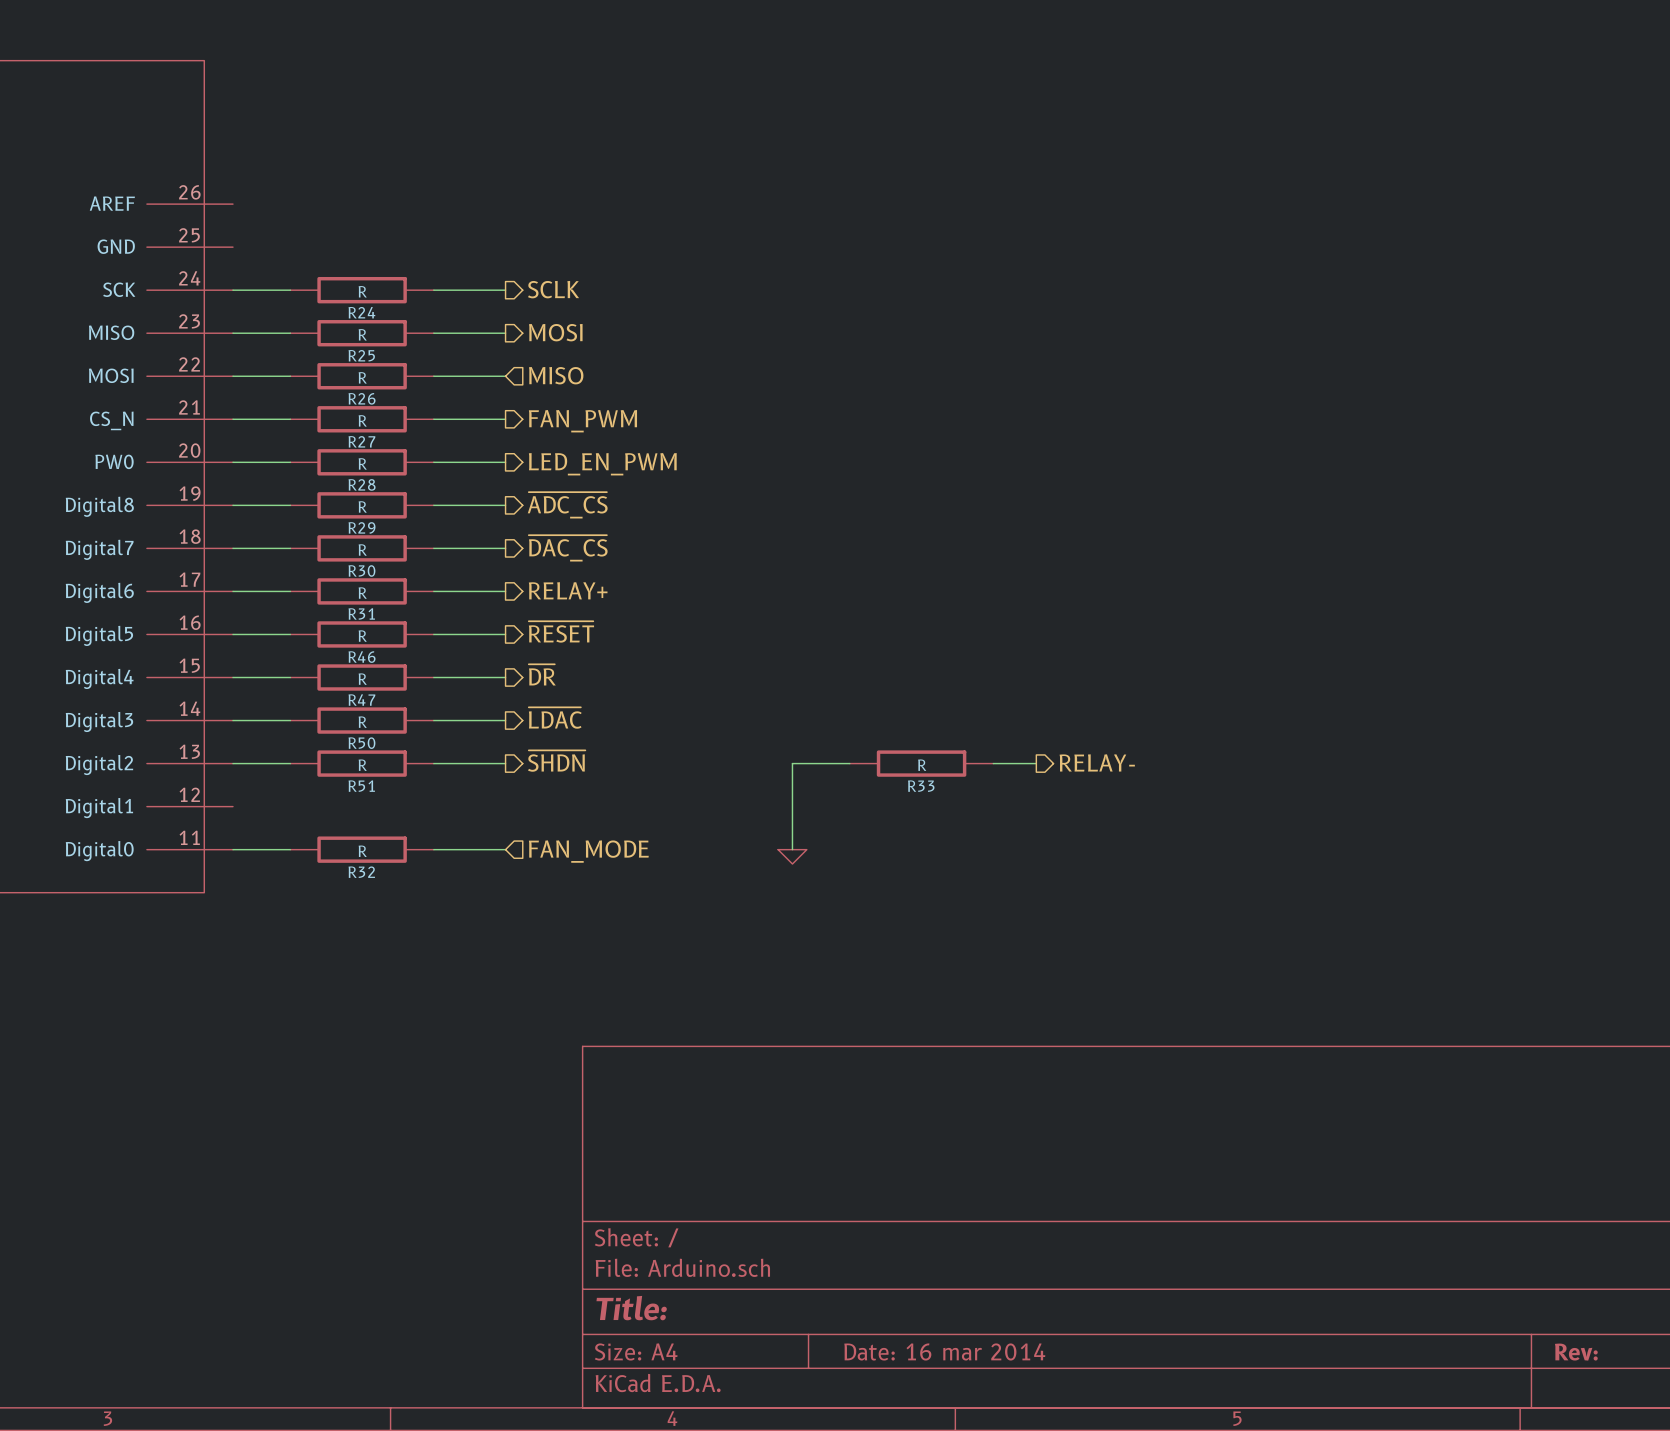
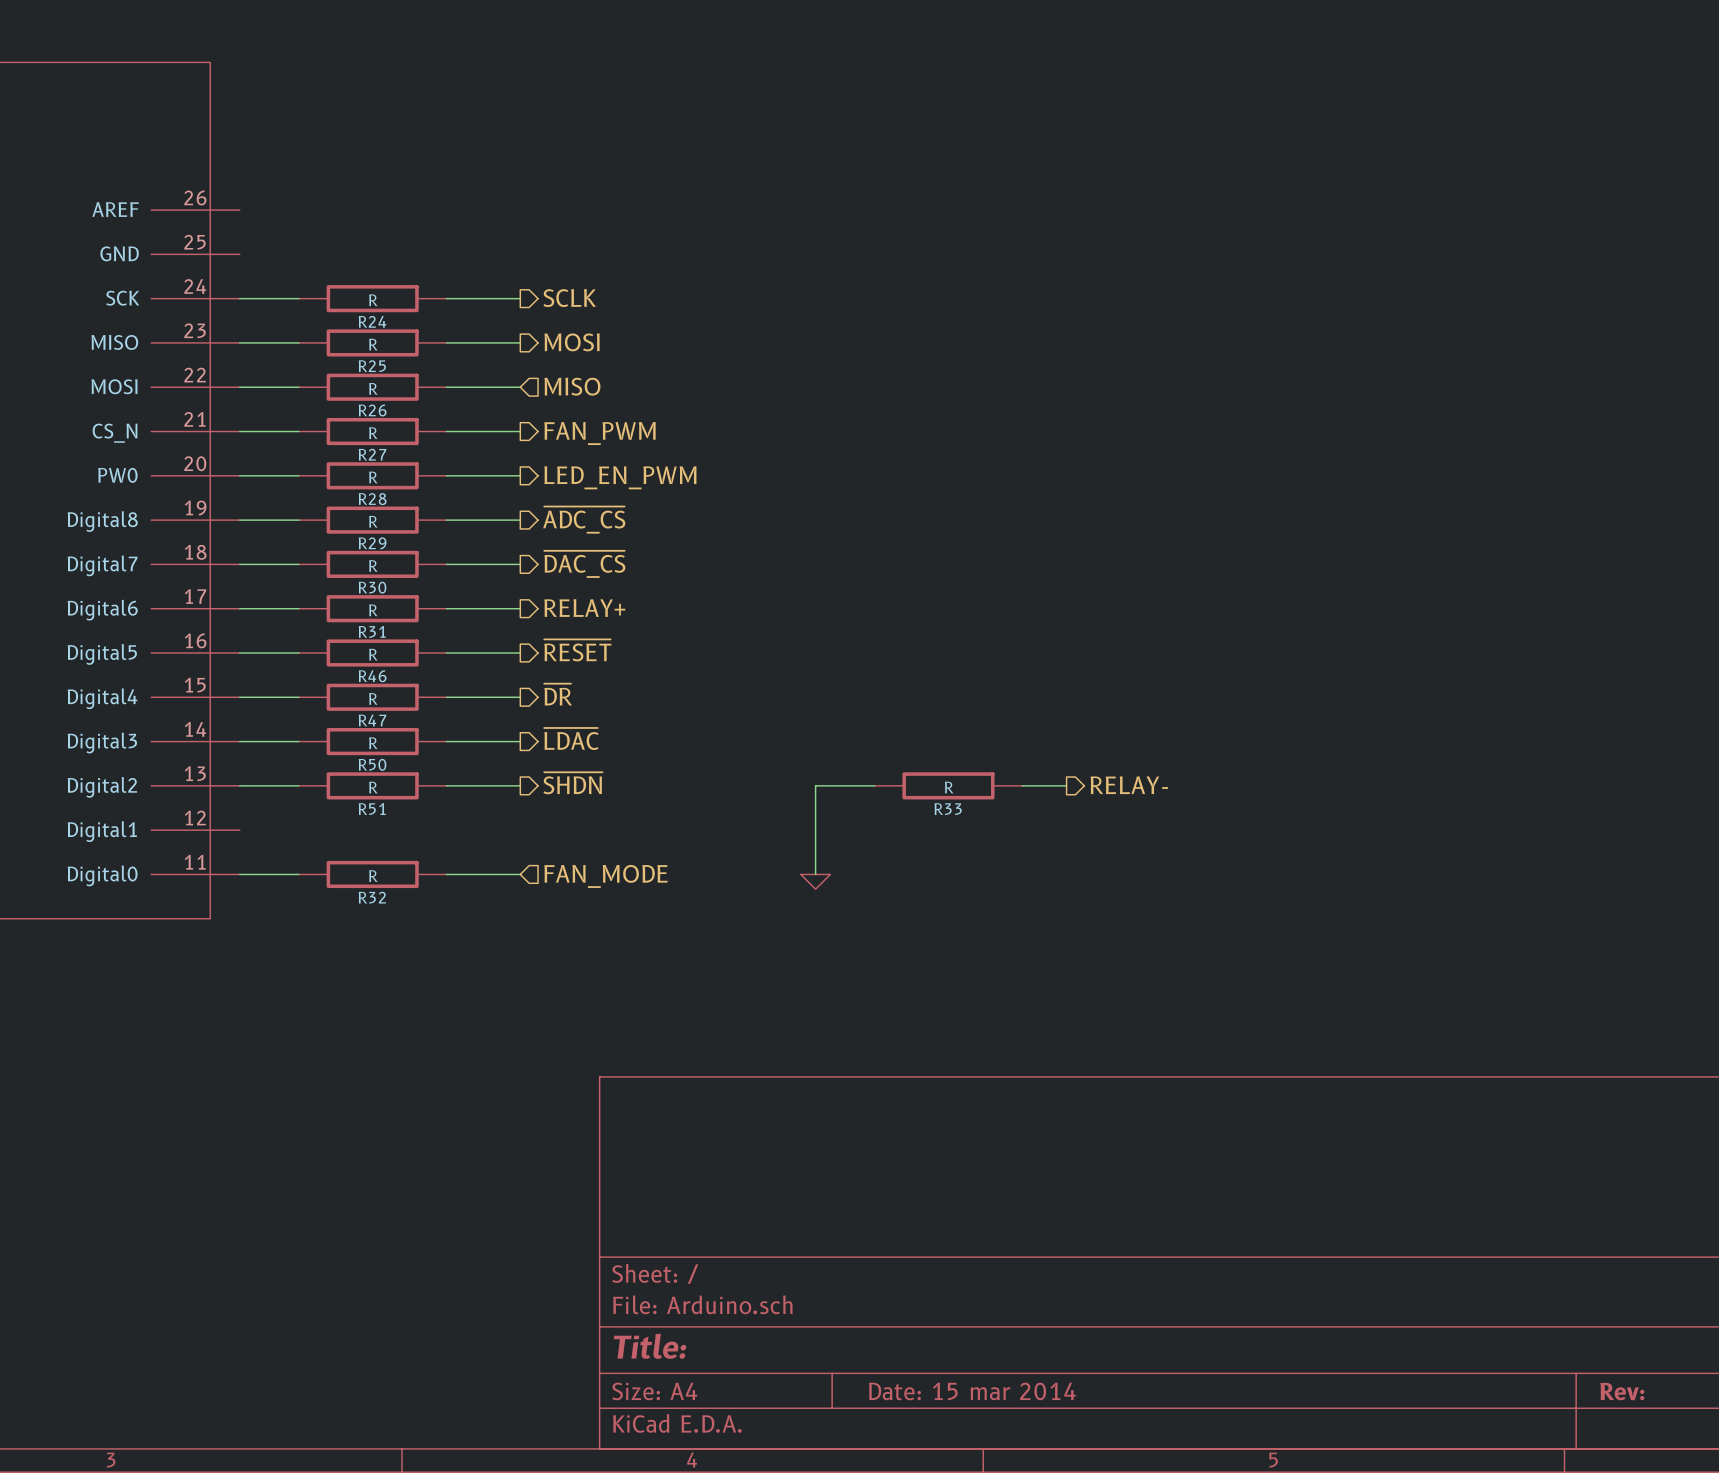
title block: Date: 16 mar 2014 (944, 1351) -> Date: 15 mar 2014 (972, 1391)

